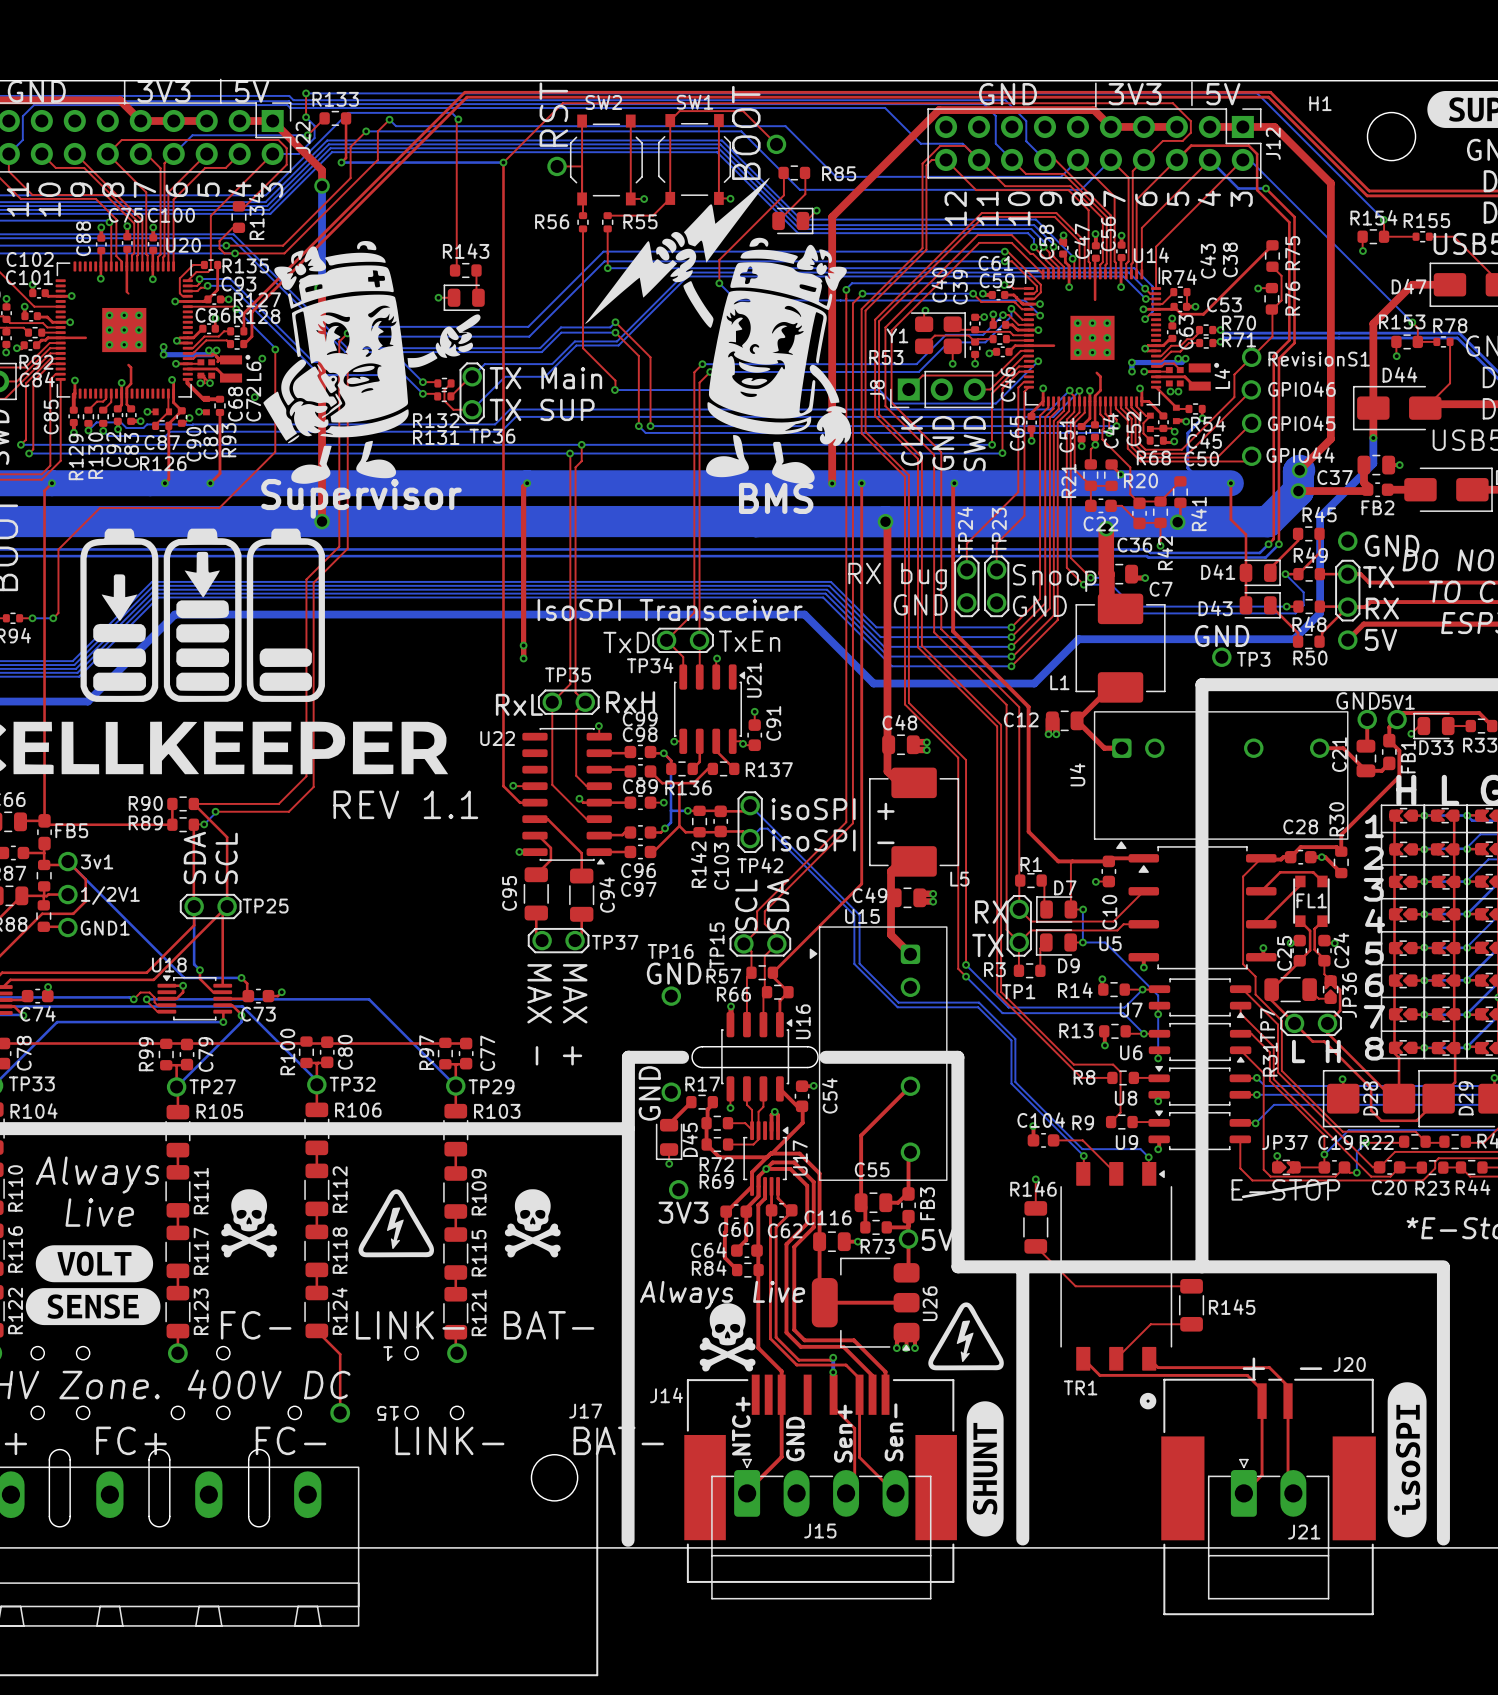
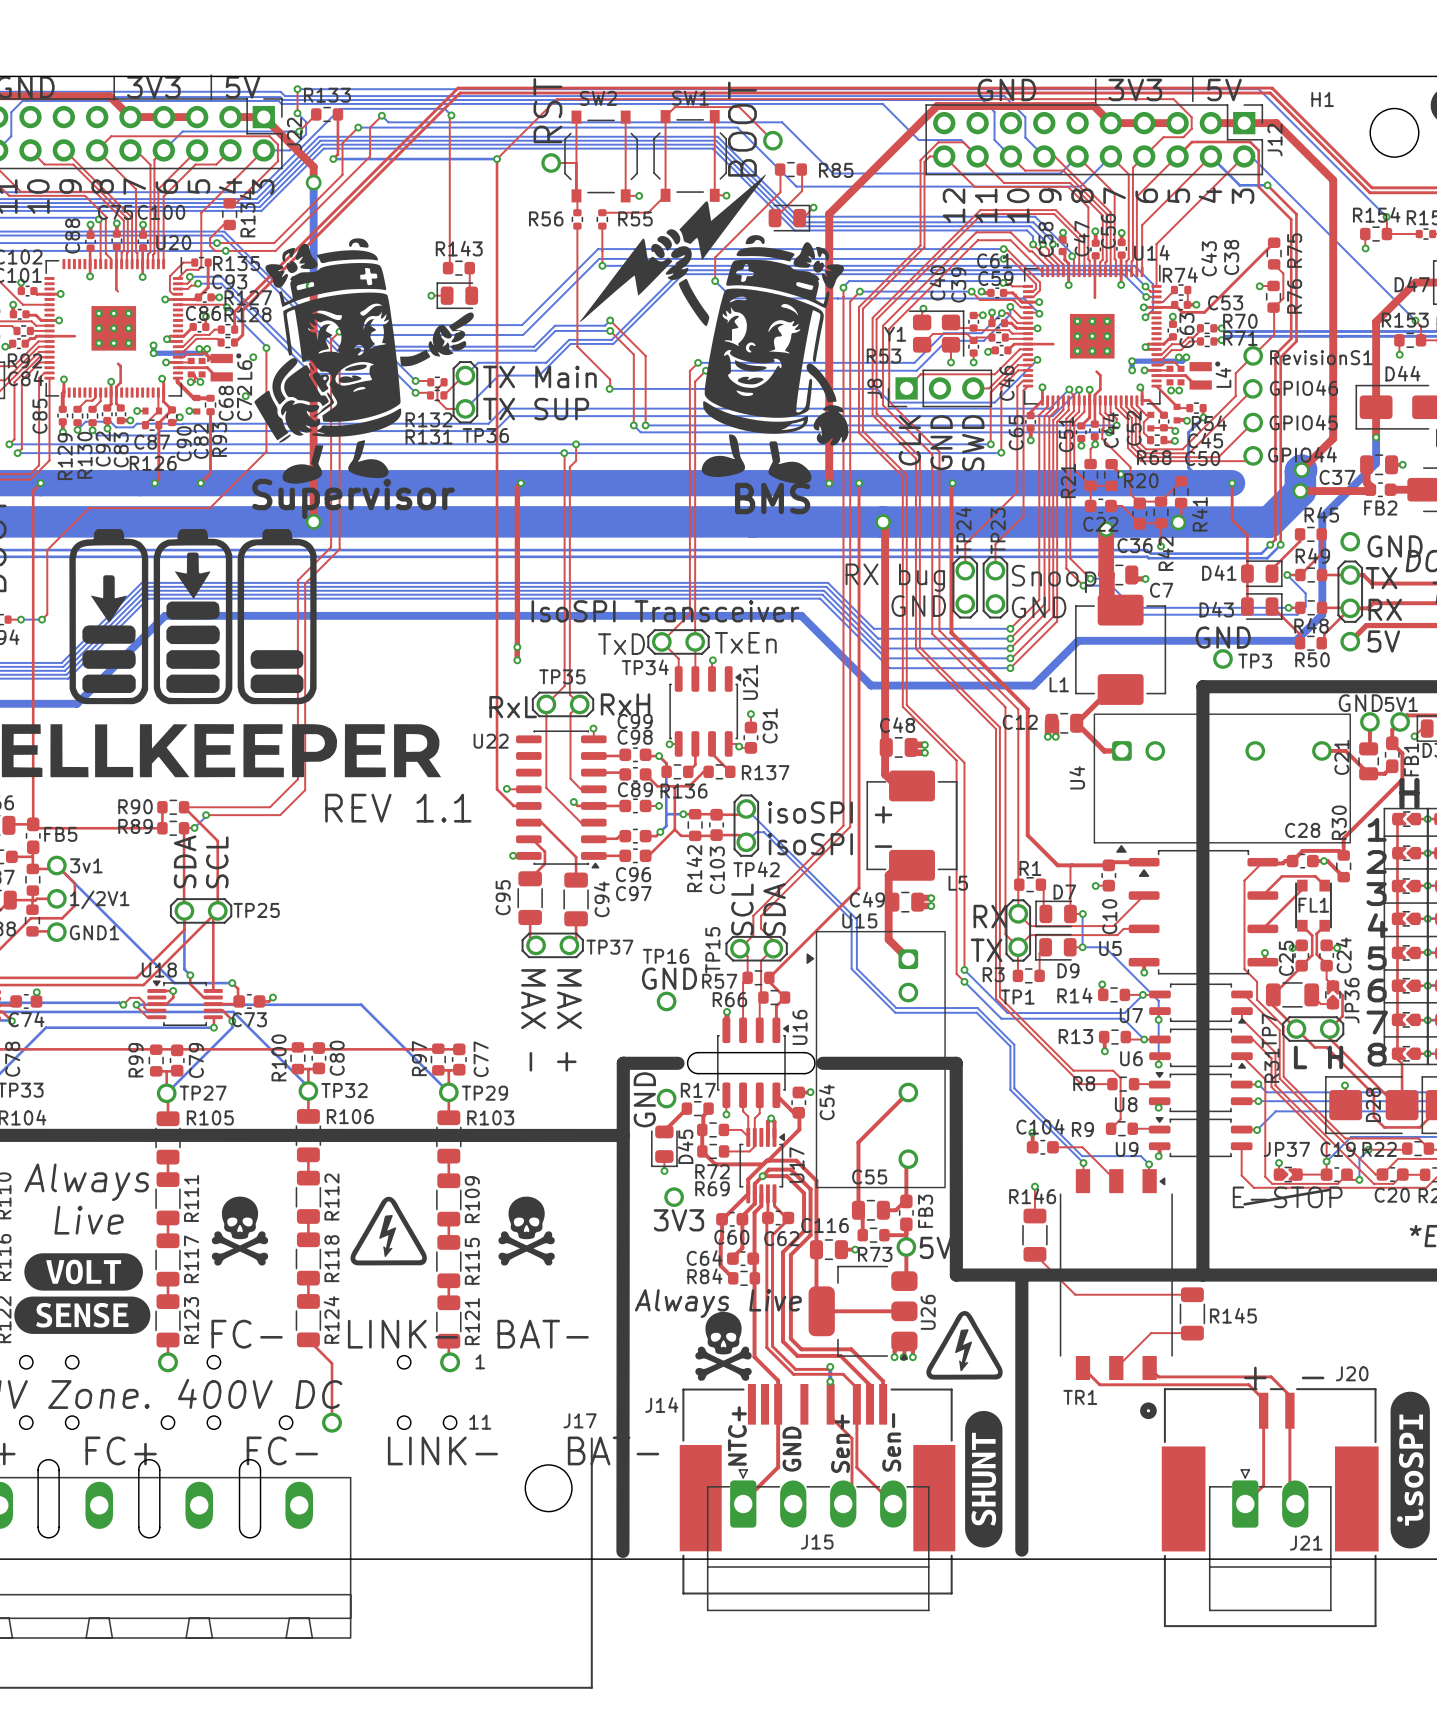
J17 text rotation: 0° (387, 1353) -> 180° (480, 1361)
J17 text position: 1 (387, 1353) -> 1 (480, 1361)
J17 text: none -> 11 (480, 1422)
J17 text: 15 (387, 1413) -> none

